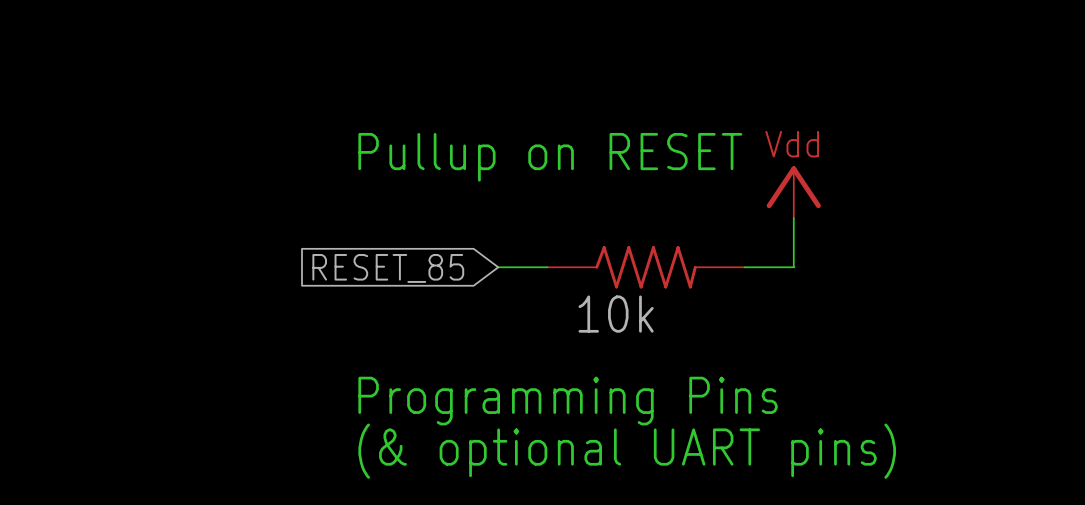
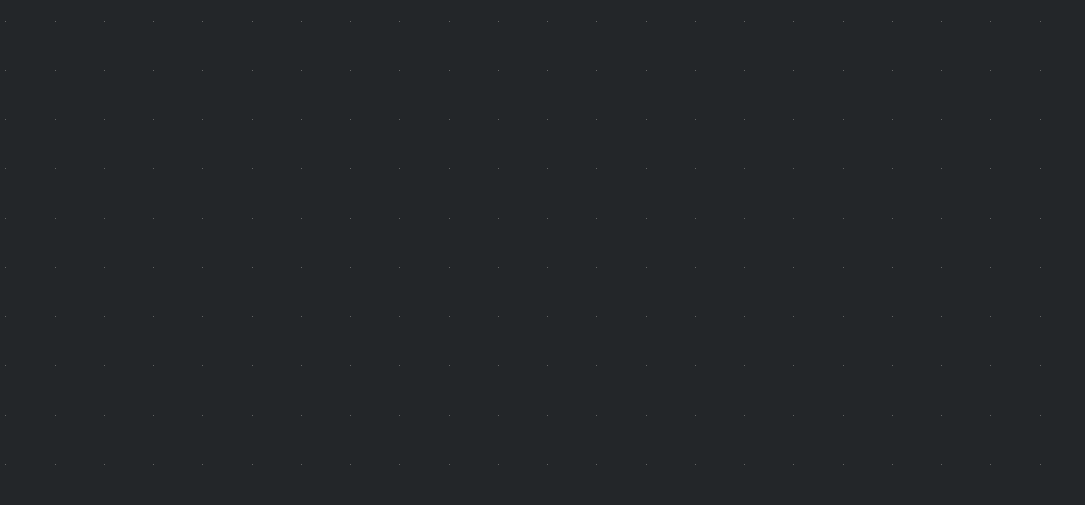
text: Pullup on RESET (550, 157) -> none
power symbol: (793, 192) -> none
wire: (793, 218) (793, 267) (744, 267) -> none
wire: (498, 267) (547, 267) -> none
part: 10k (646, 267) -> none
global label: RESET_85 (388, 268) -> none
text: Programming Pins (568, 401) -> none
text: (& optional UART pins) (627, 451) -> none

